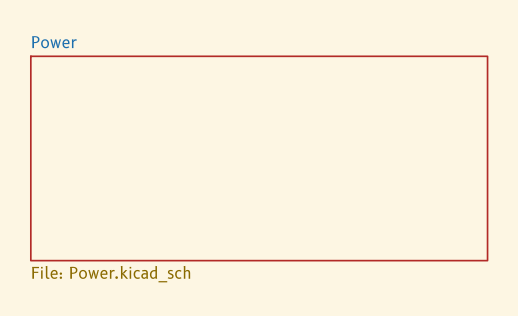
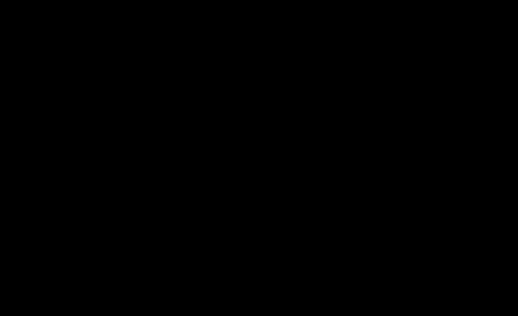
sheet Power: File: Power.kicad_sch (259, 158) -> none

